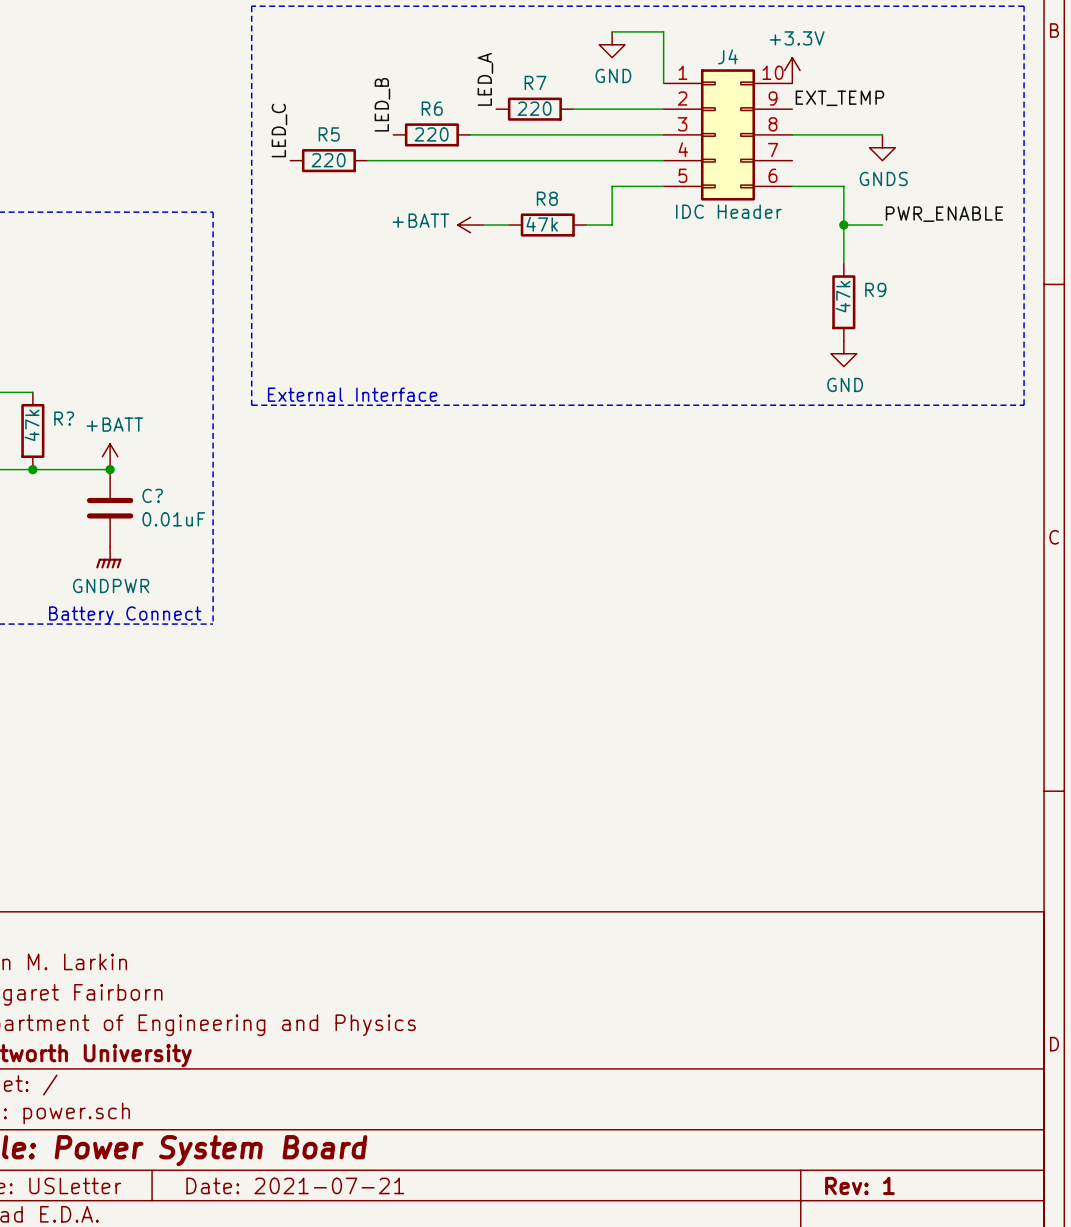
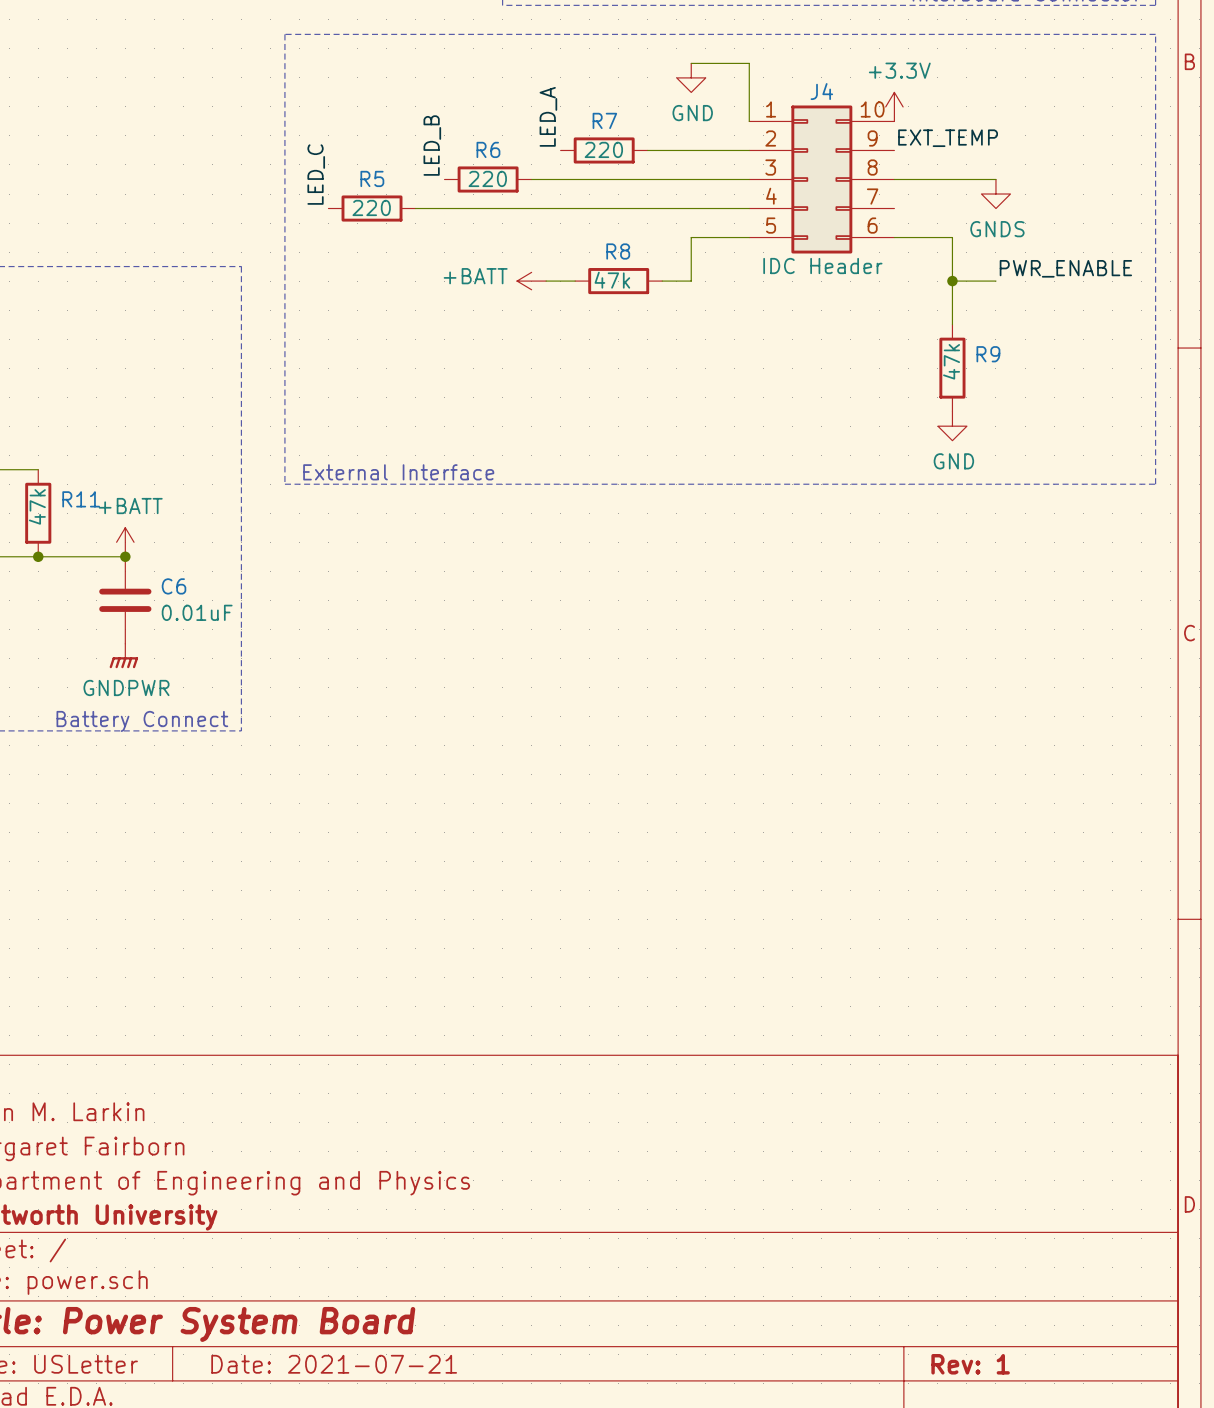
R? name: R? (64, 418) -> R11 (81, 499)
C? name: C? (152, 495) -> C6 (174, 586)

